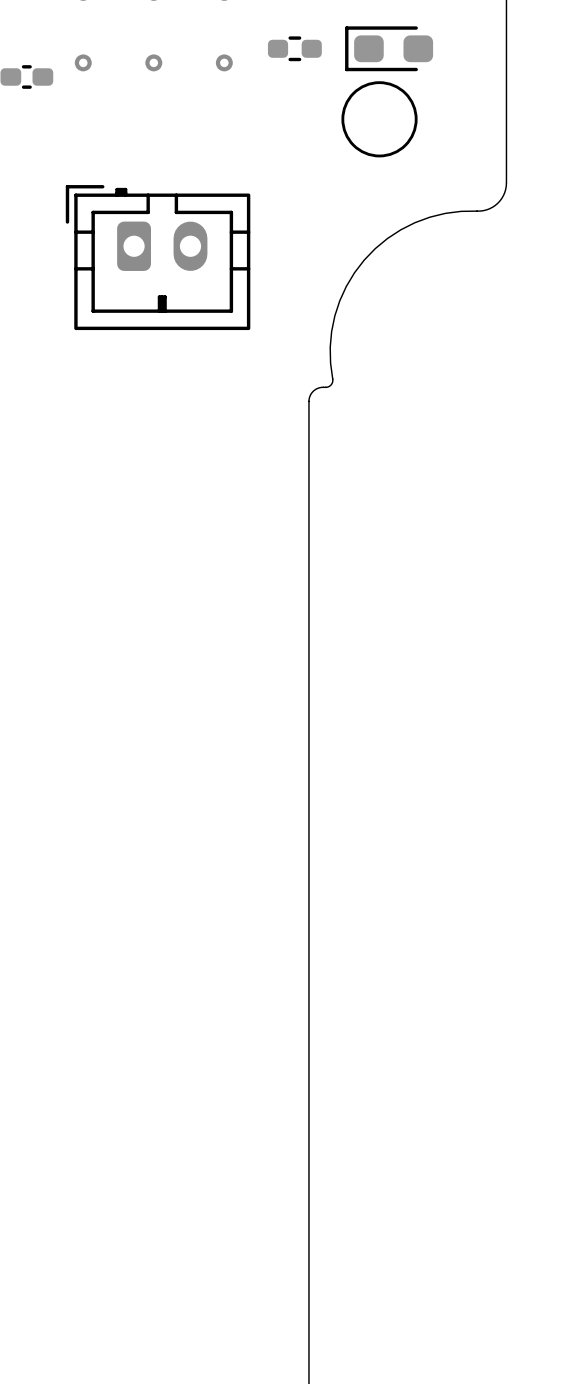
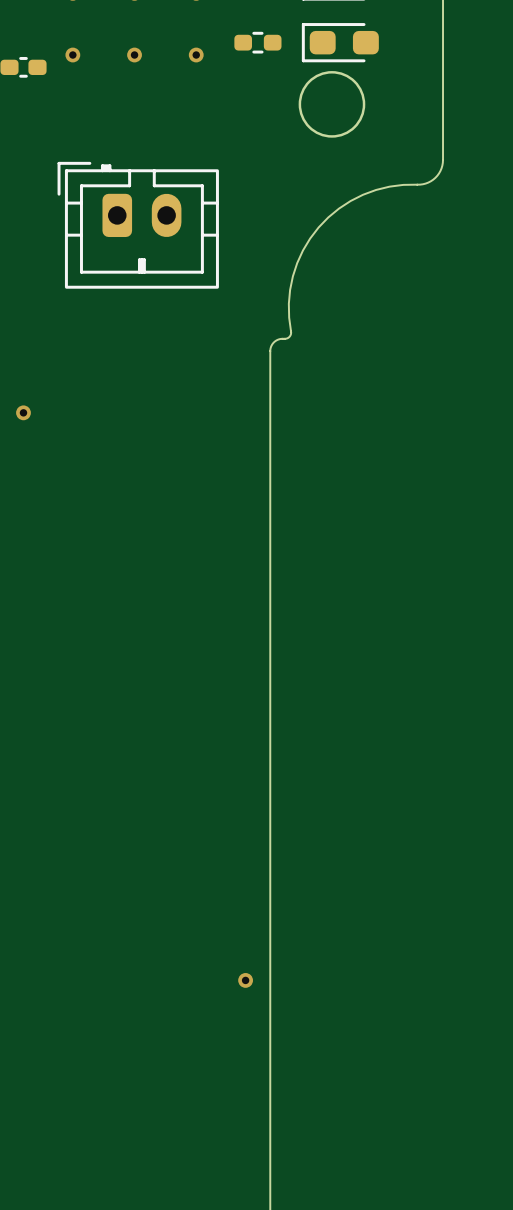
via: none -> (23, 412)
via: none -> (245, 980)

